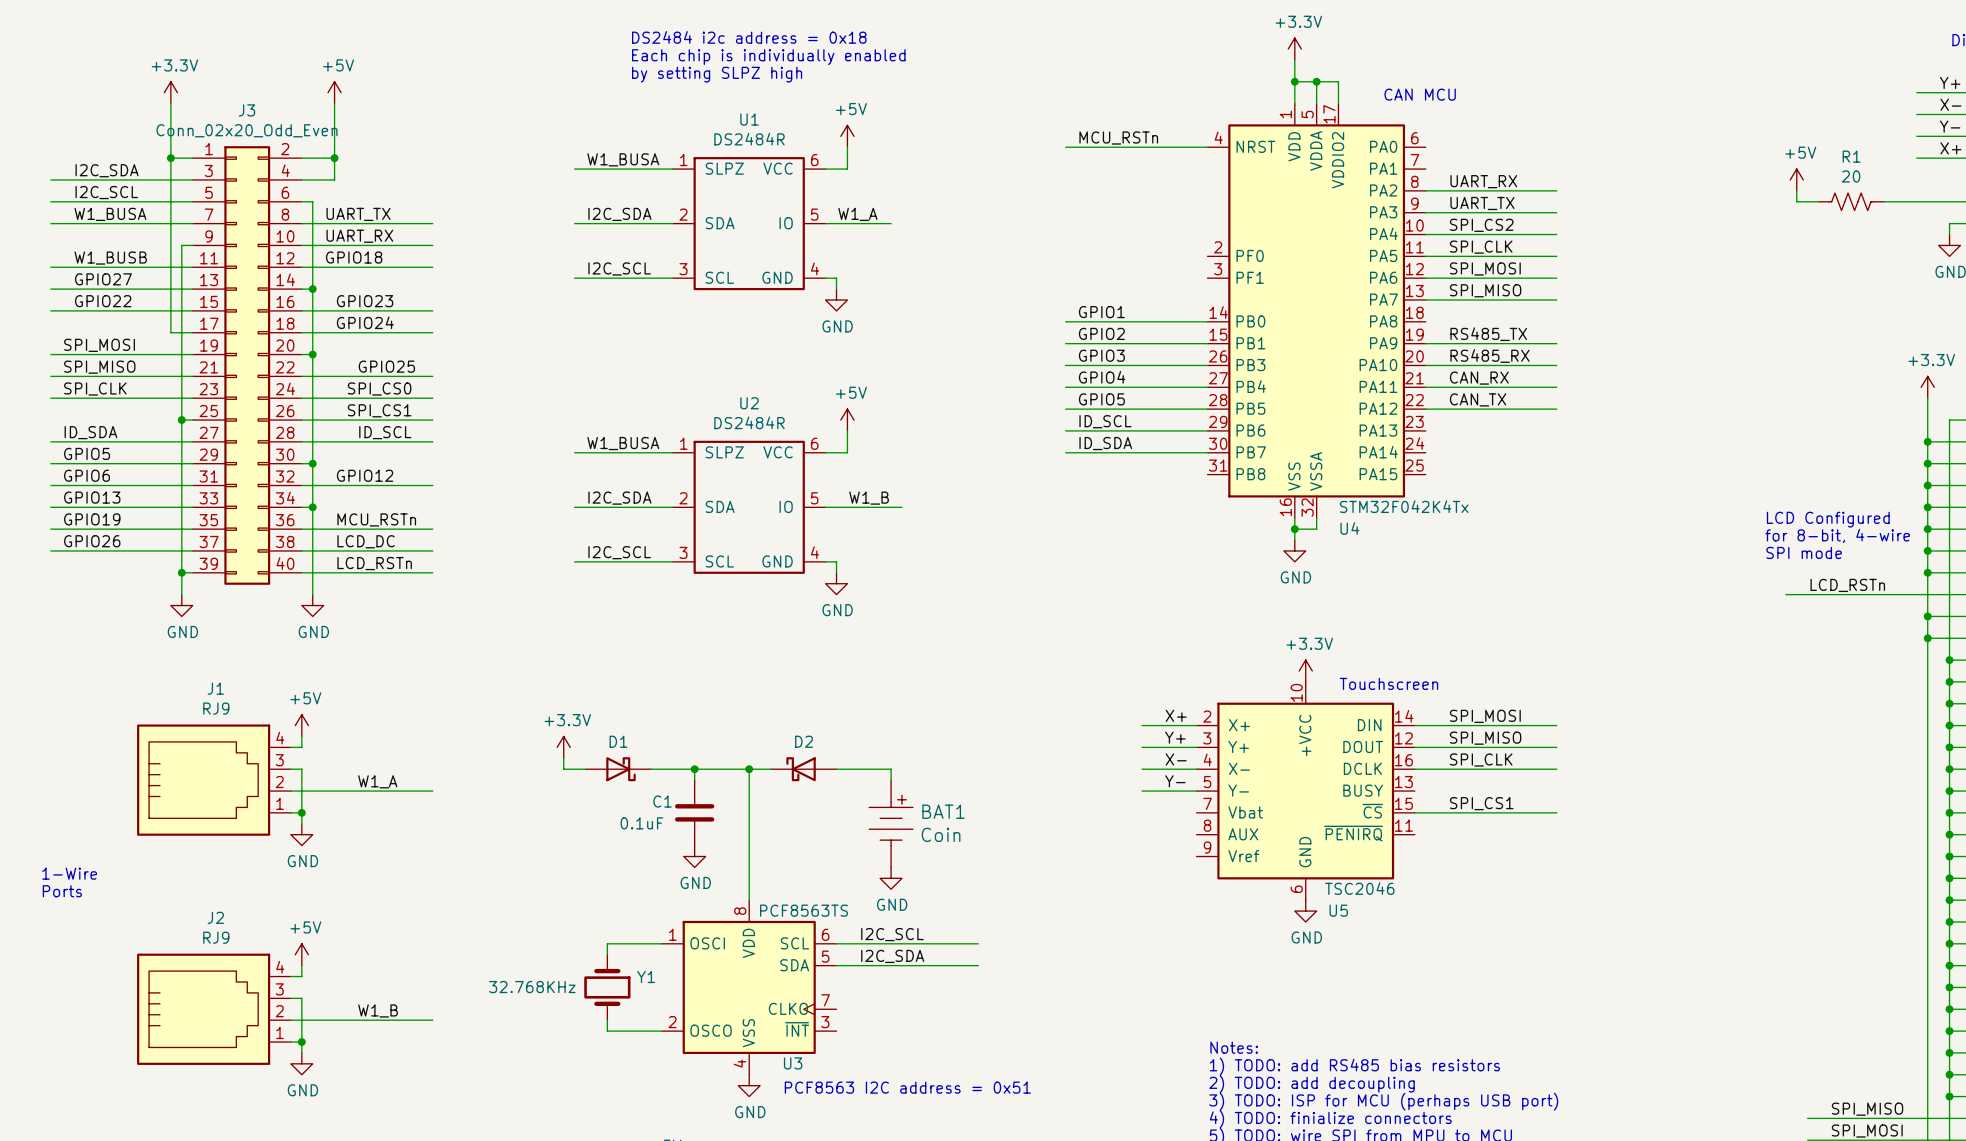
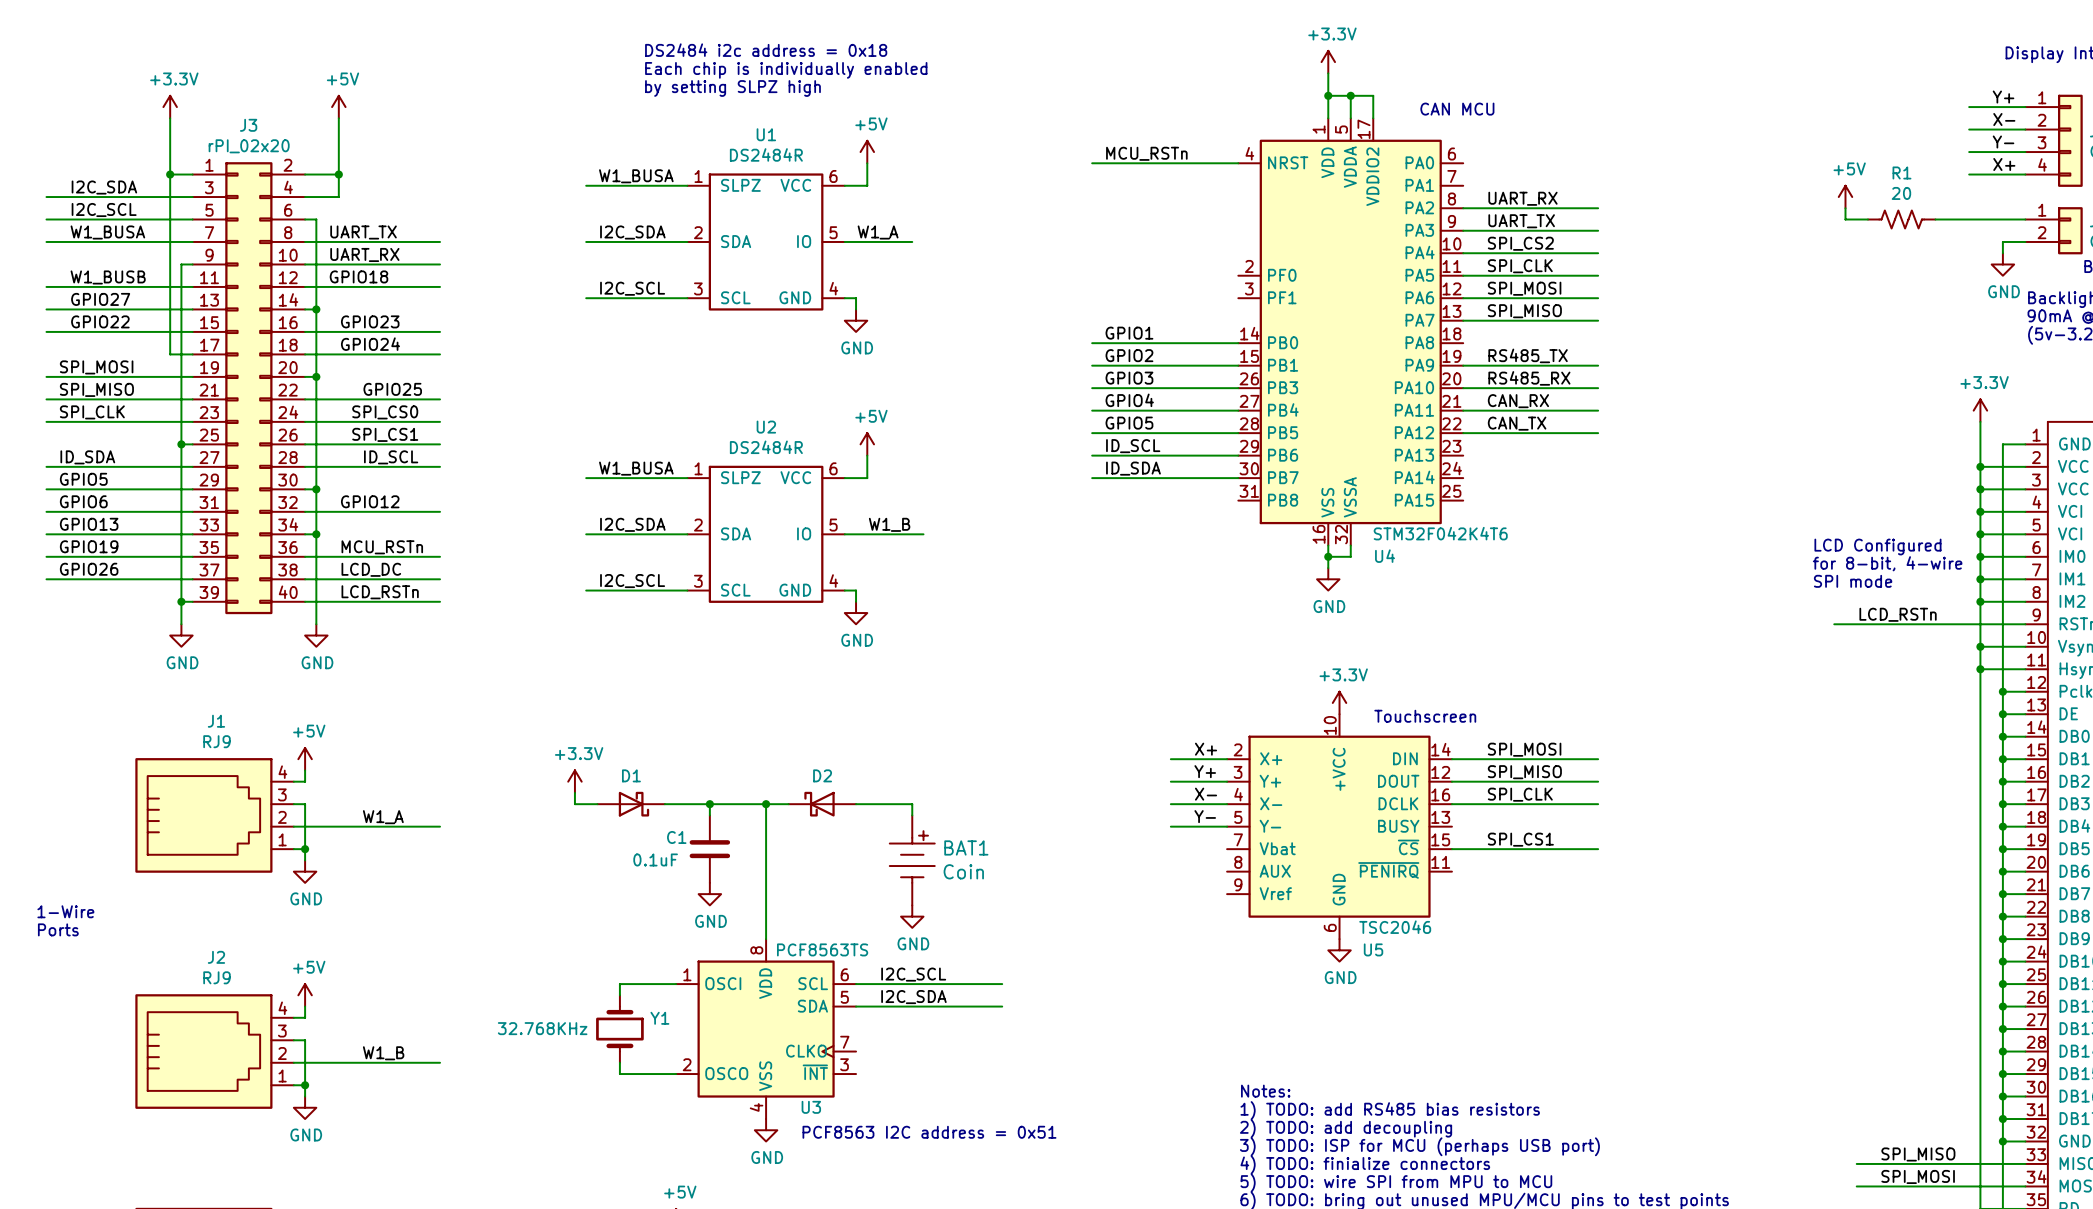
J3 value: Conn_02x20_Odd_Even (247, 130) -> rPI_02x20 (249, 146)
U4 value: STM32F042K4Tx (1404, 506) -> STM32F042K4T6 (1440, 533)

